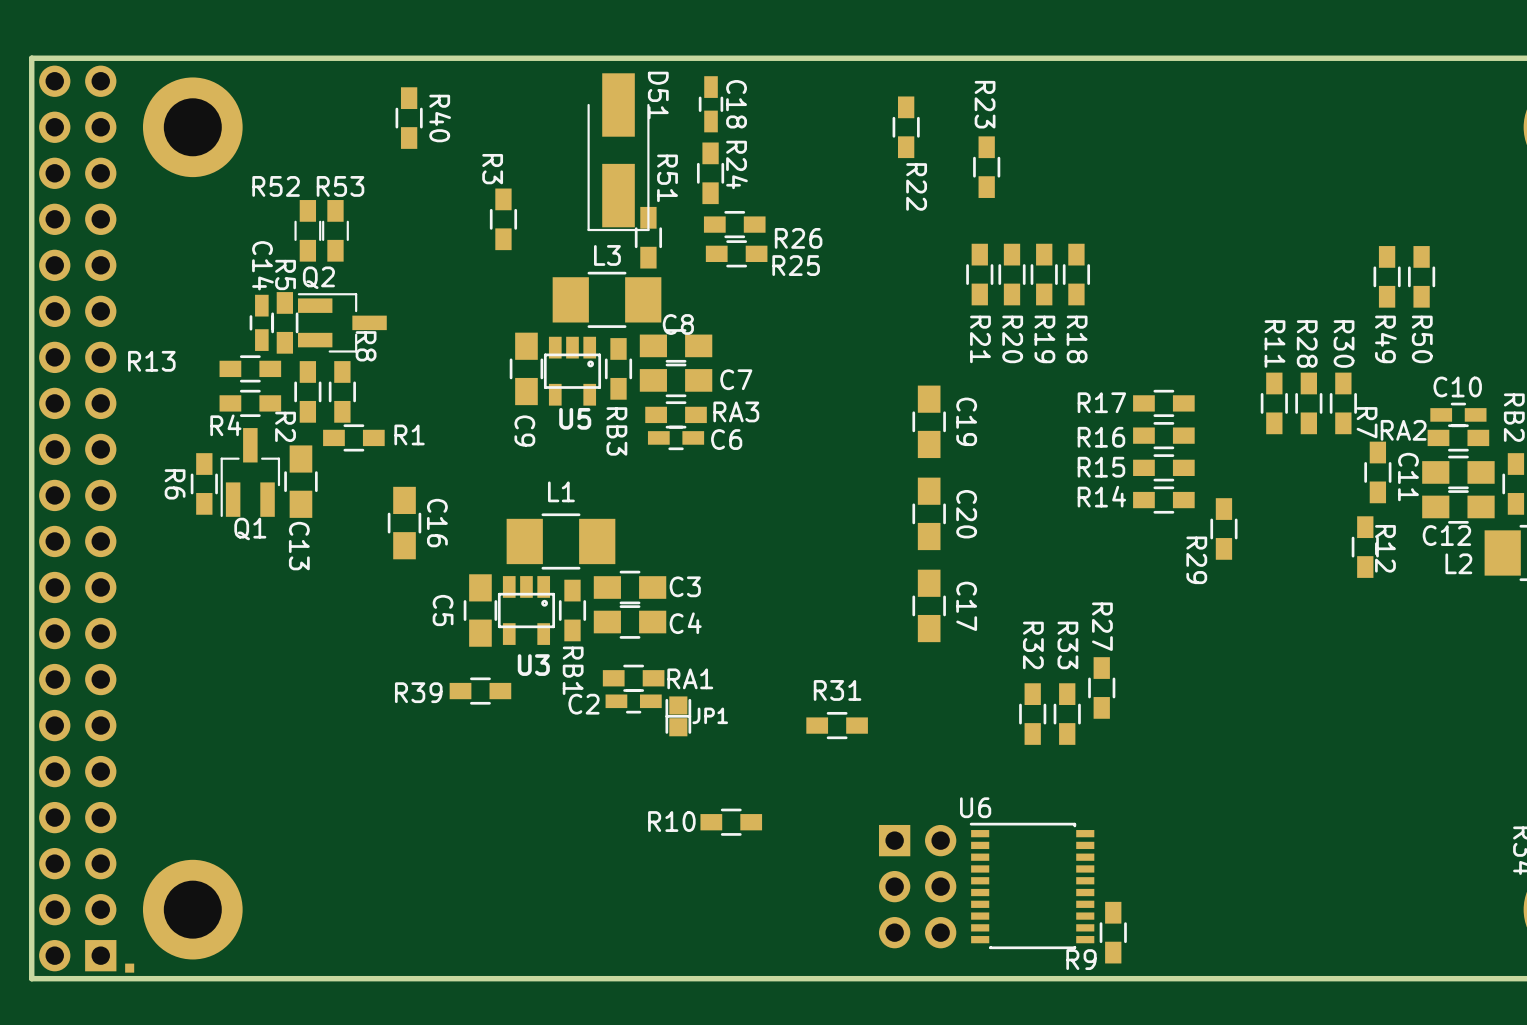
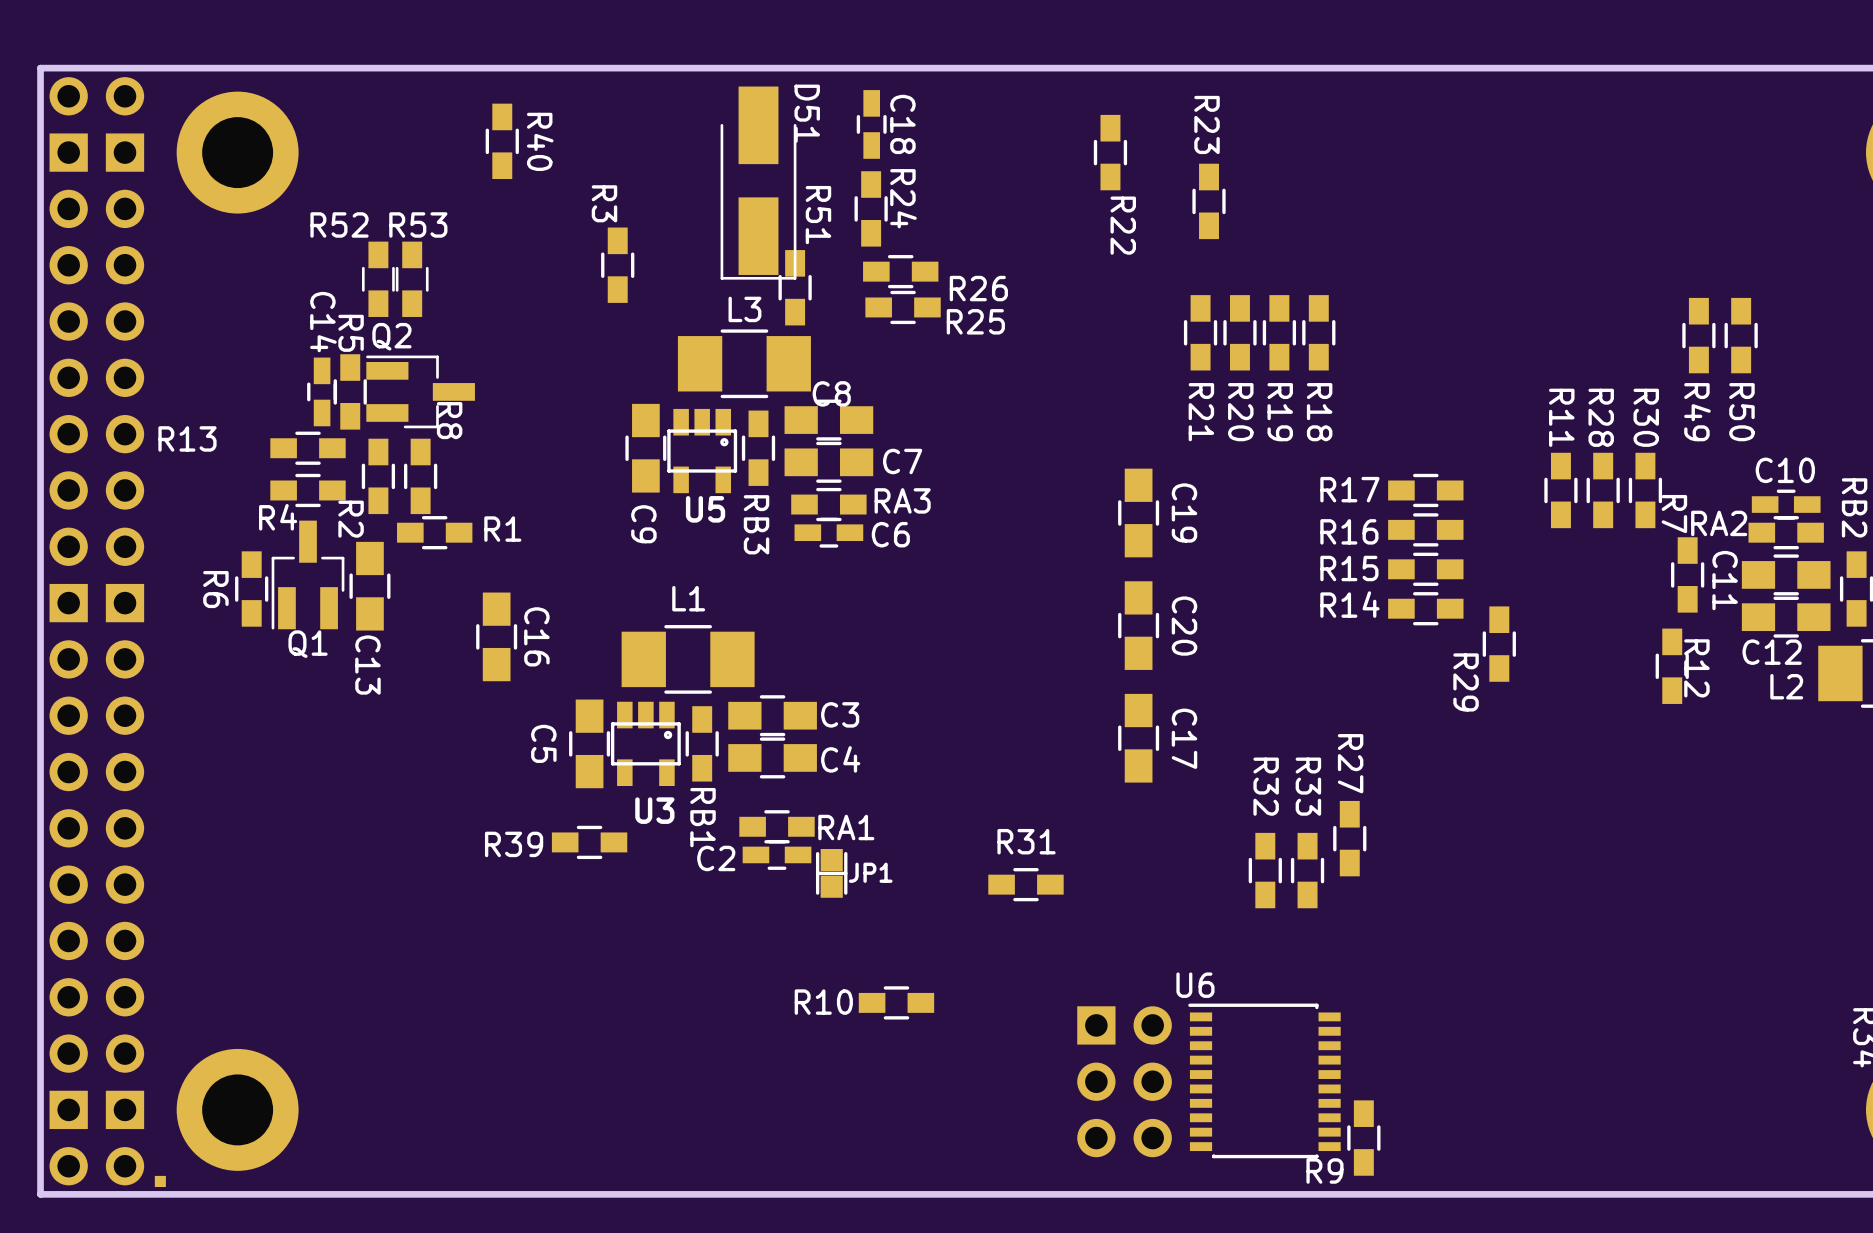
part footprint: [39, 65, 117, 972] -> [49, 77, 145, 1186]

